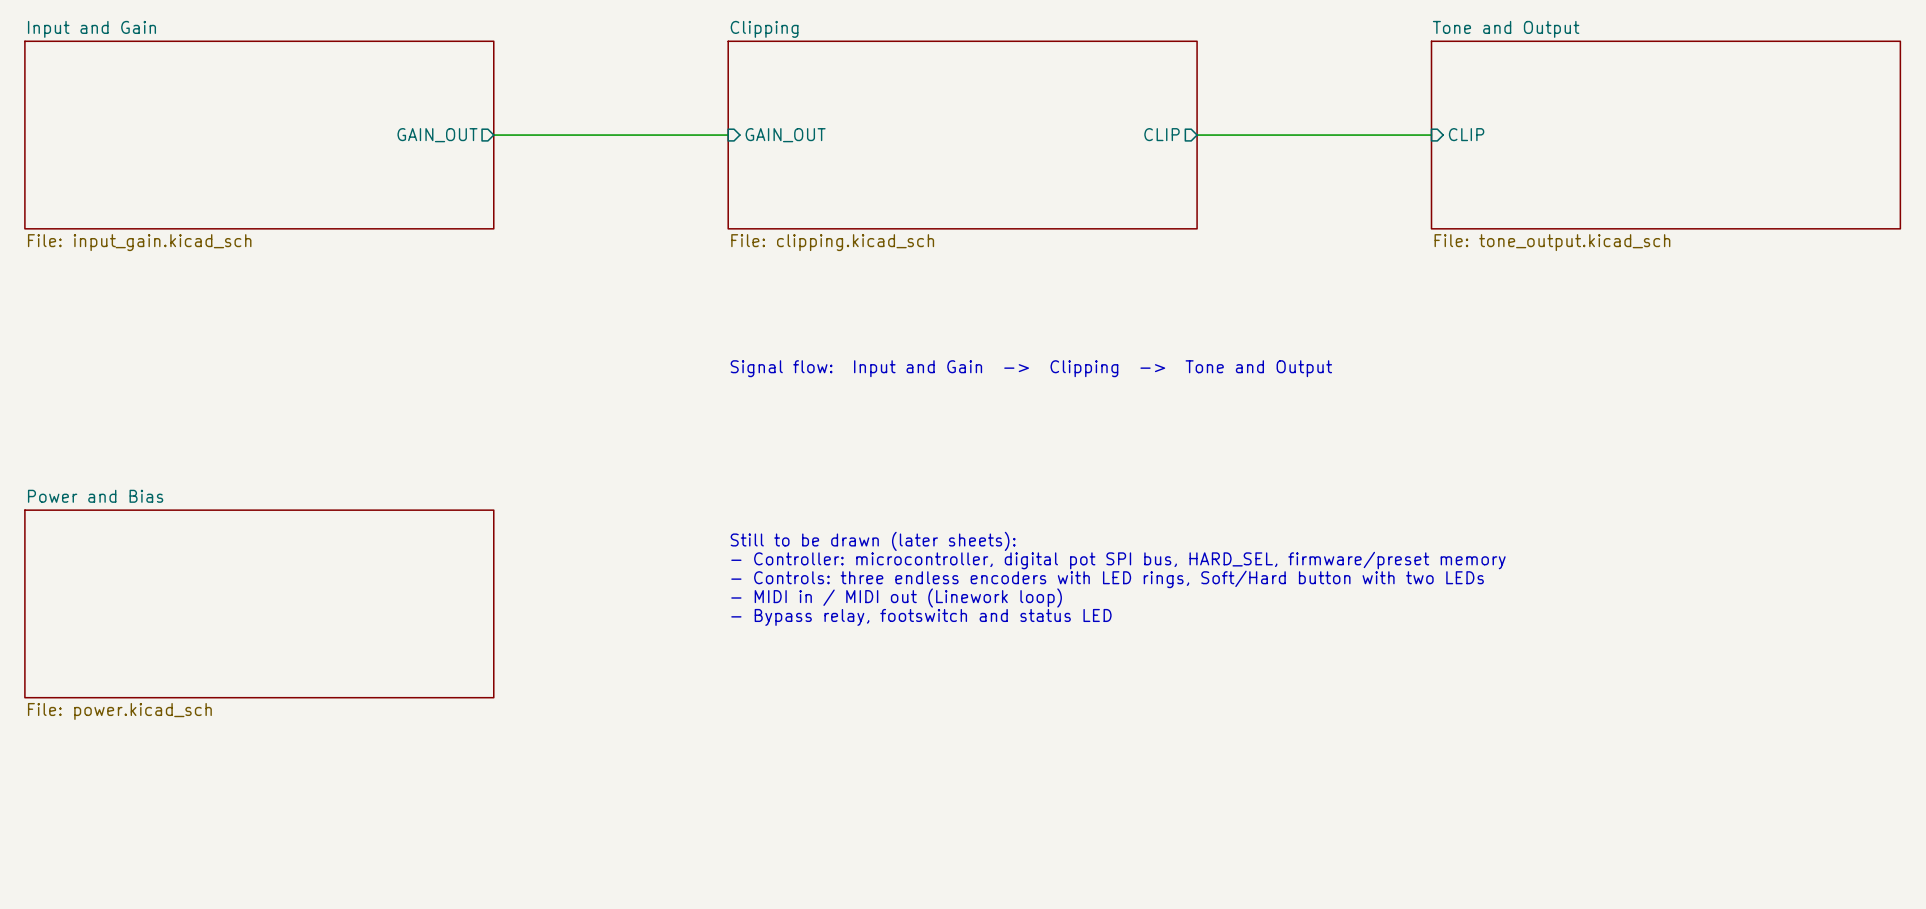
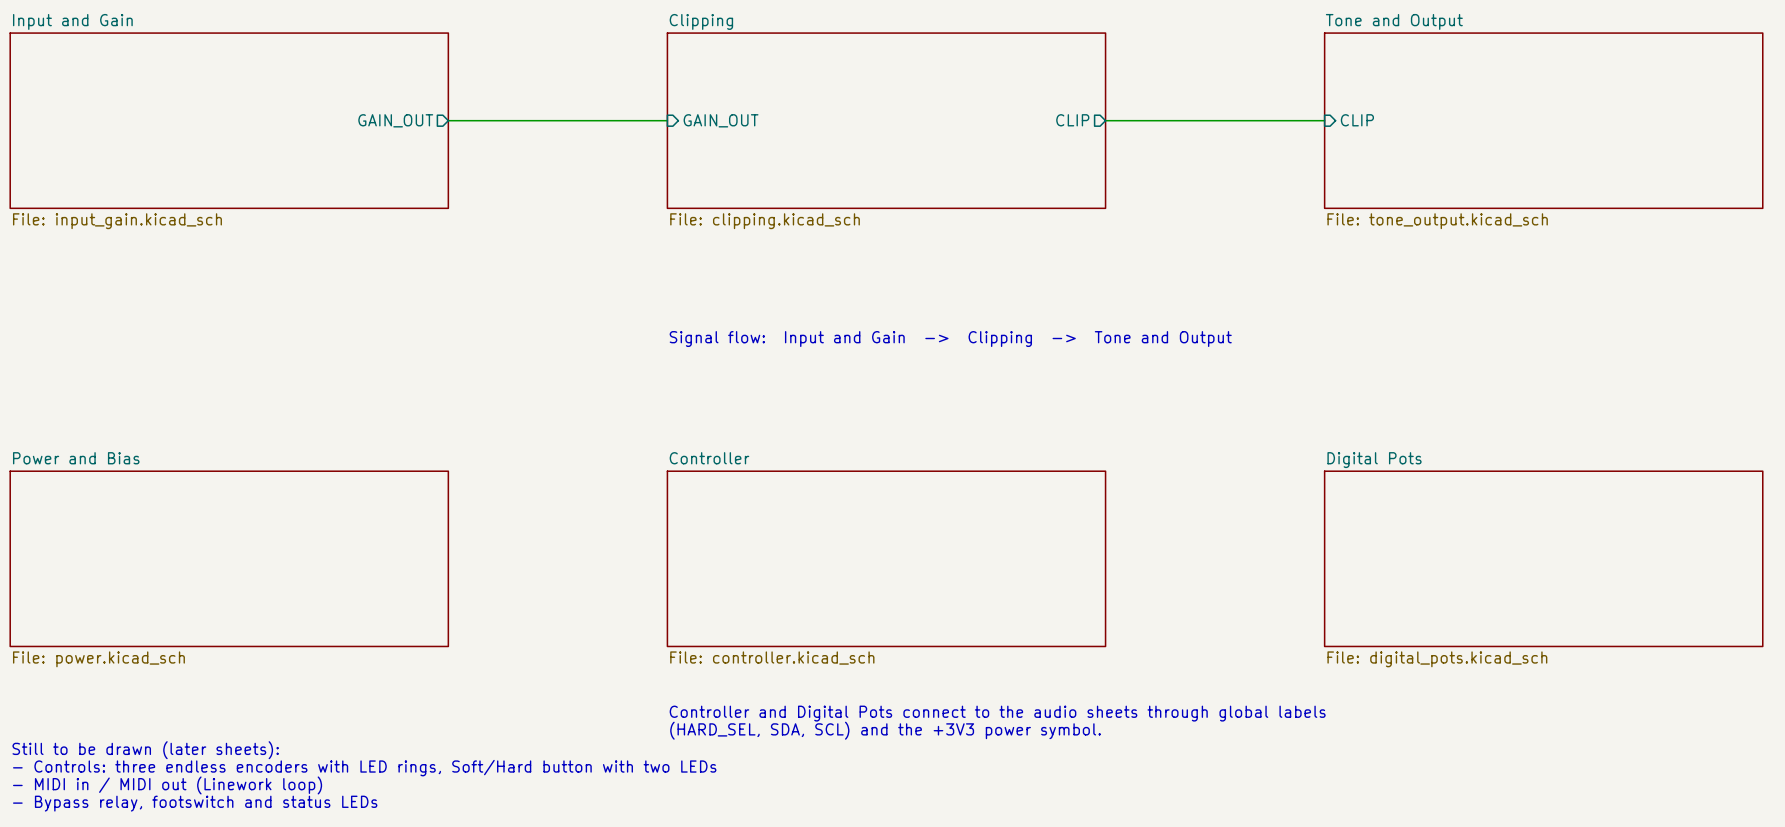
text: Still to be drawn (later sheets): (873, 541) -> none
text: - Controller: microcontroller, digital pot SPI bus, HARD_SEL, firmware/preset memory (1118, 560) -> none
text: - Controls: three endless encoders with LED rings, Soft/Hard button with two LEDs (1107, 579) -> none
text: - MIDI in / MIDI out (Linework loop) (896, 598) -> none
sheet Controller: none -> File: controller.kicad_sch (886, 558)
sheet Digital Pots: none -> File: digital_pots.kicad_sch (1543, 558)
text: - Bypass relay, footswitch and status LED (921, 617) -> none
text: none -> Controller and Digital Pots connect to the audio sheets through global labels (997, 713)
text: none -> (HARD_SEL, SDA, SCL) and the +3V3 power symbol. (885, 730)
text: none -> Still to be drawn (later sheets): (145, 750)
text: none -> - Controls: three endless encoders with LED rings, Soft/Hard button with two LEDs (364, 768)
text: none -> - MIDI in / MIDI out (Linework loop) (167, 785)
text: none -> - Bypass relay, footswitch and status LEDs (195, 803)

